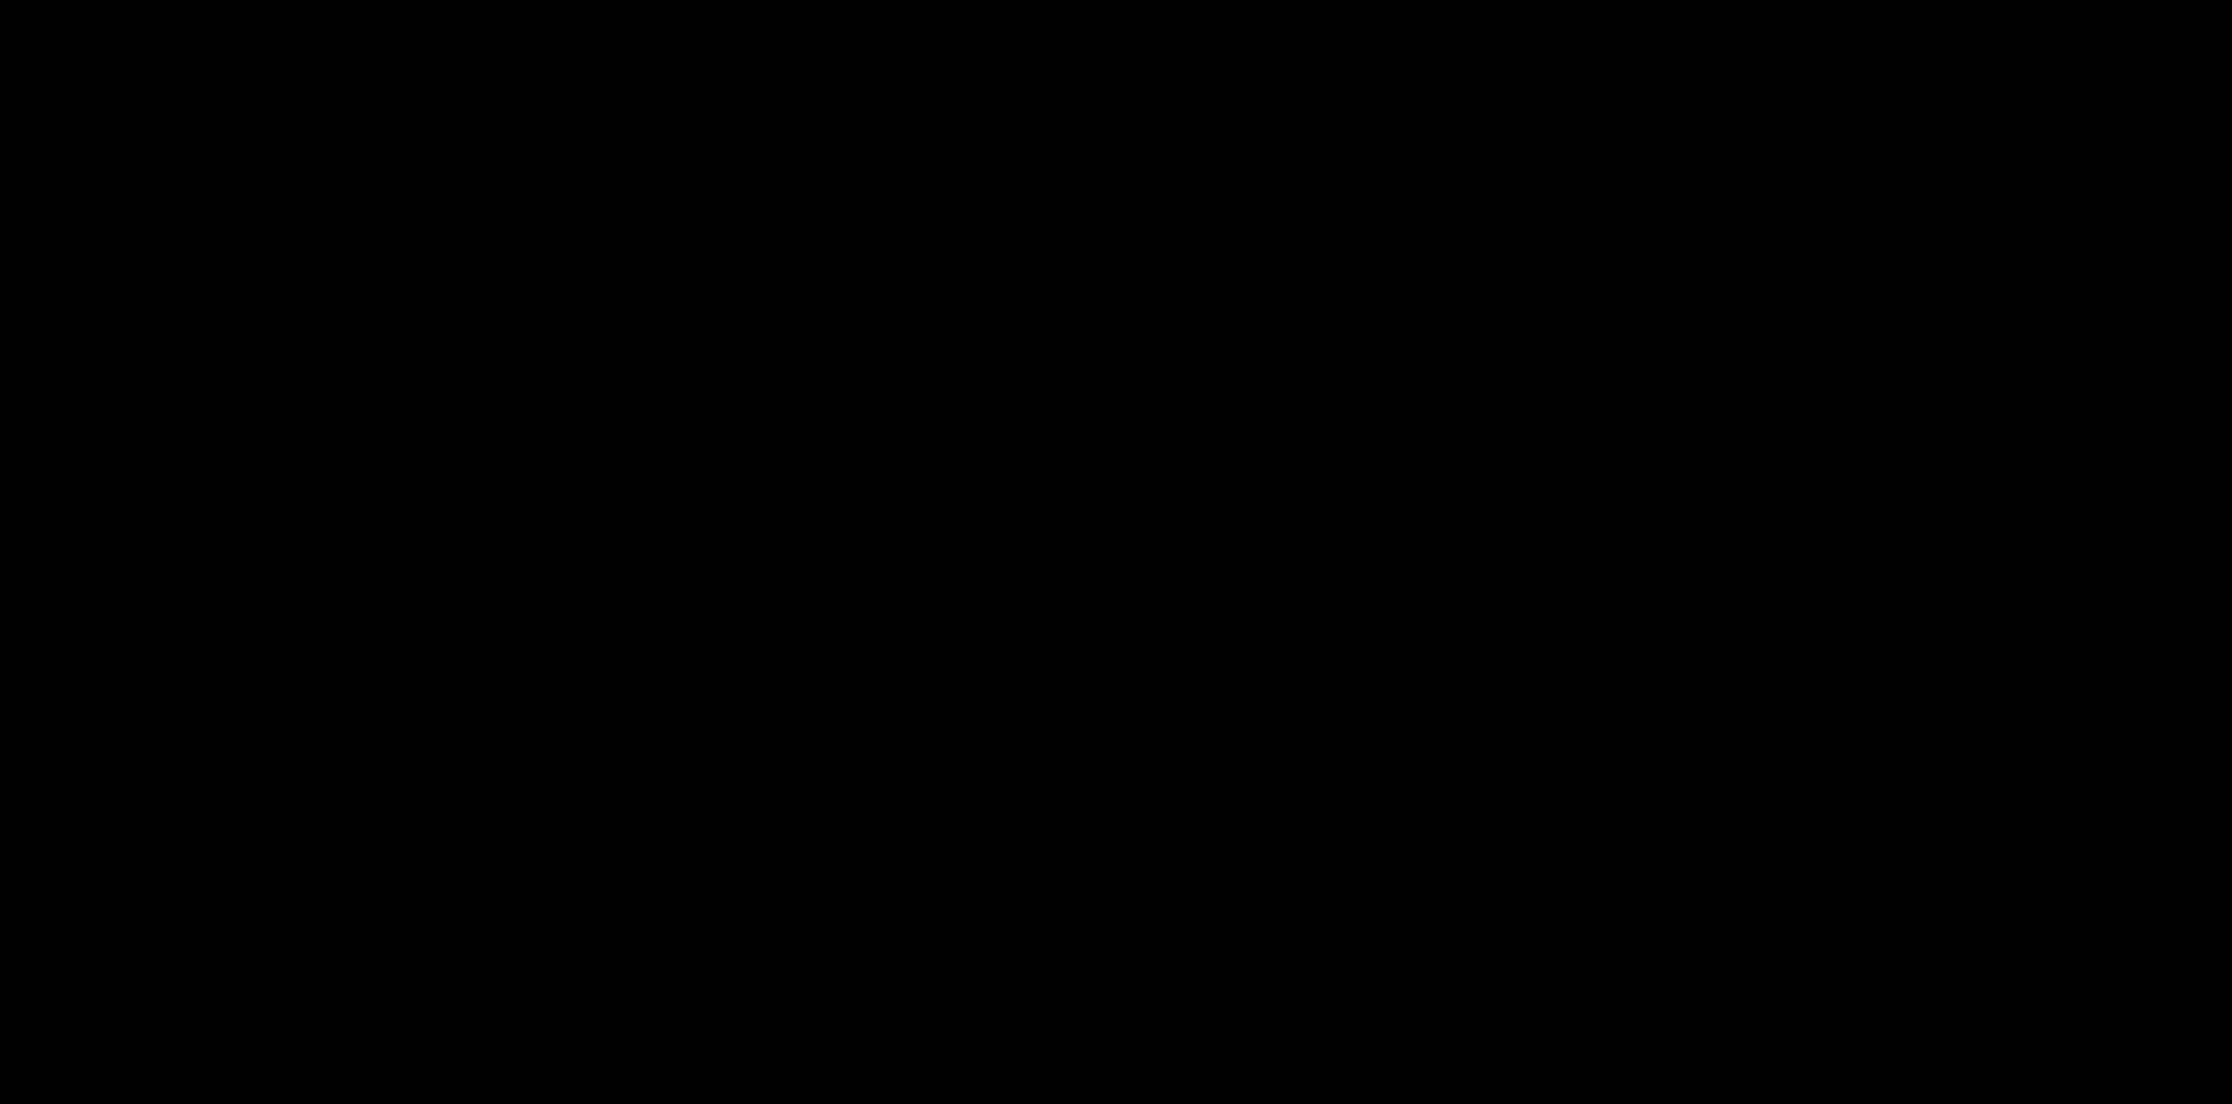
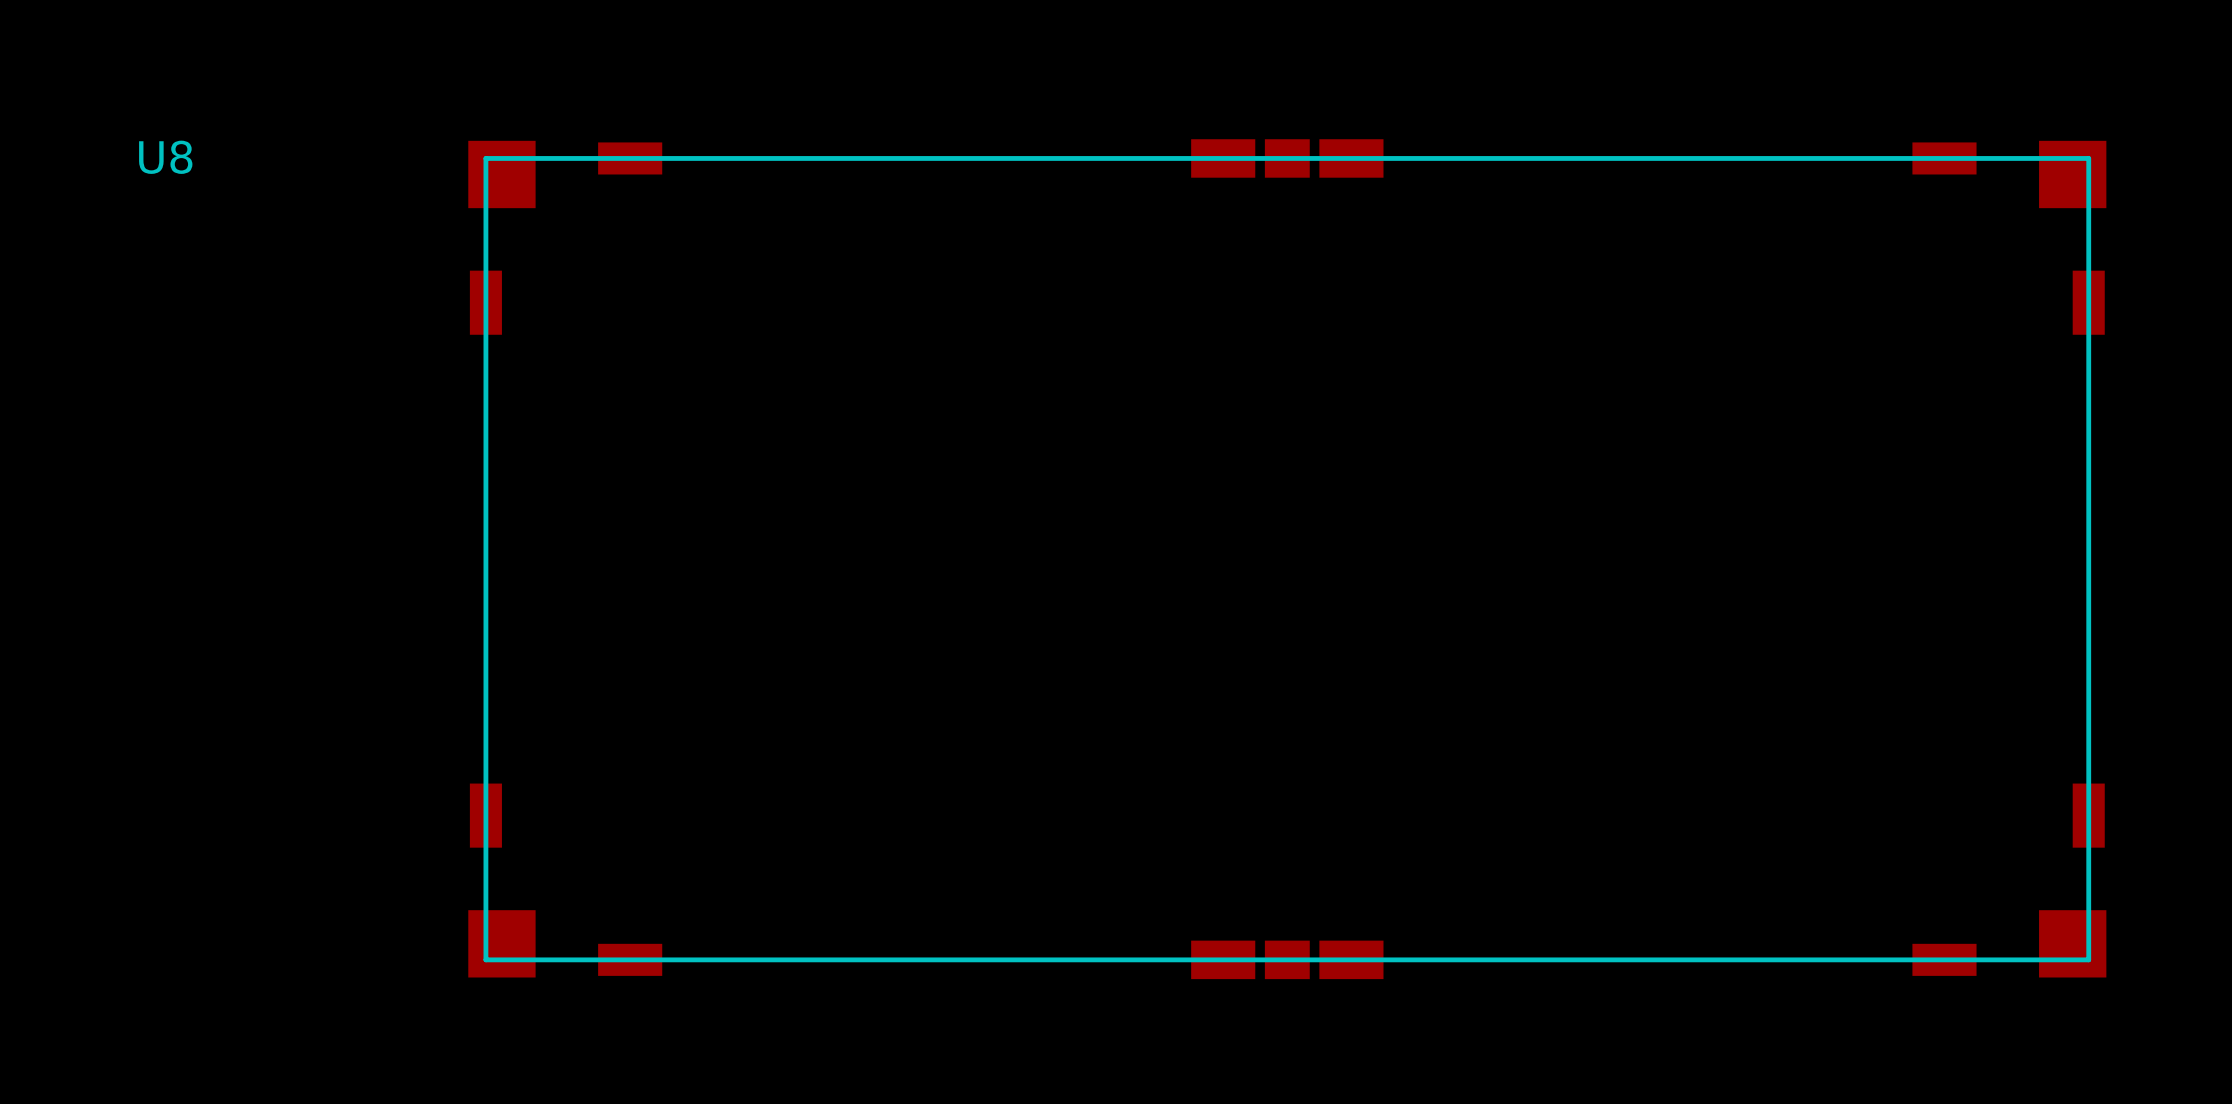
U8: none -> (1287, 559)

